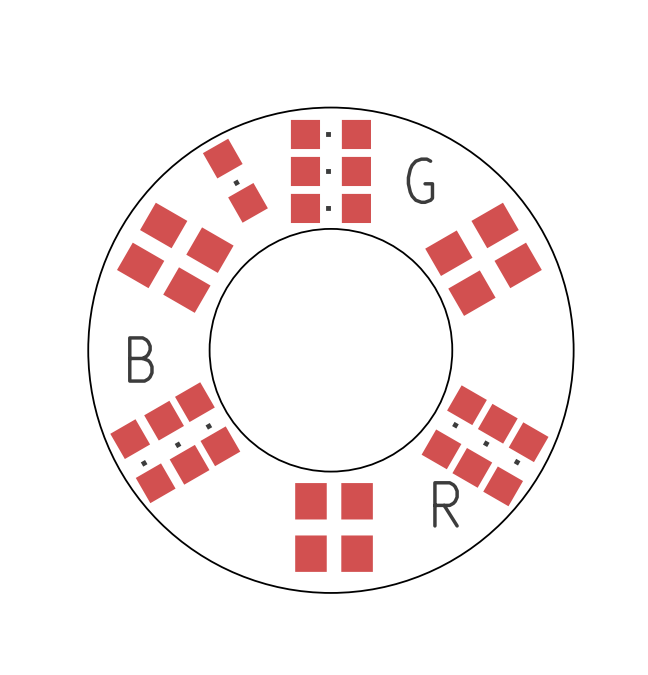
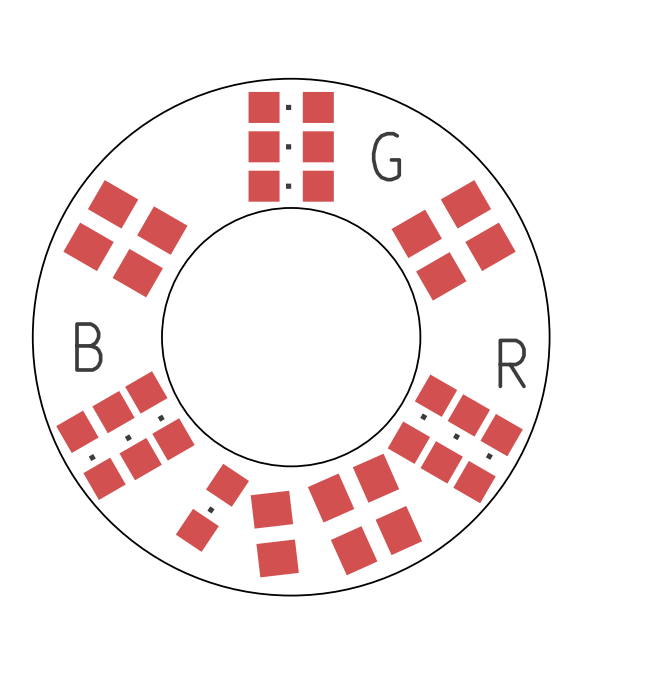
part: (235, 180) -> none
part: none -> (353, 488)
part: (334, 501) -> none
text position: R (446, 504) -> R (512, 363)
part: none -> (212, 507)
part: none -> (274, 534)
part: none -> (376, 540)
part: (334, 553) -> none

